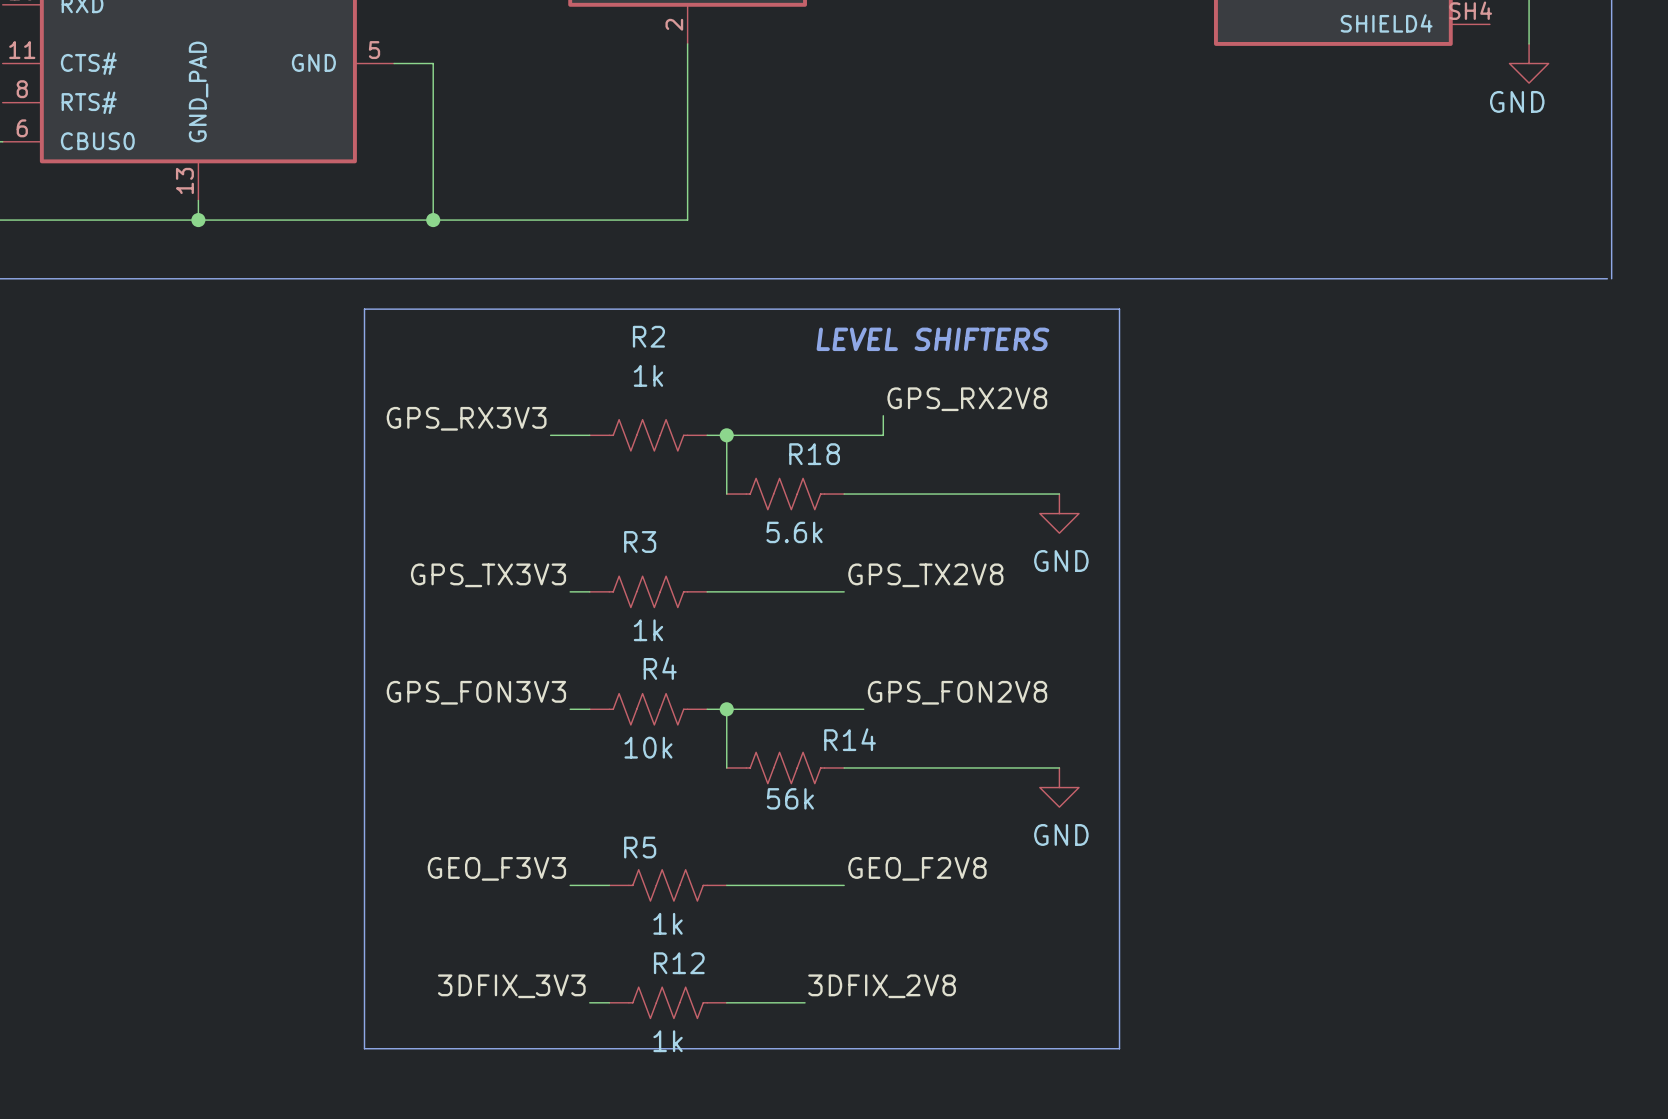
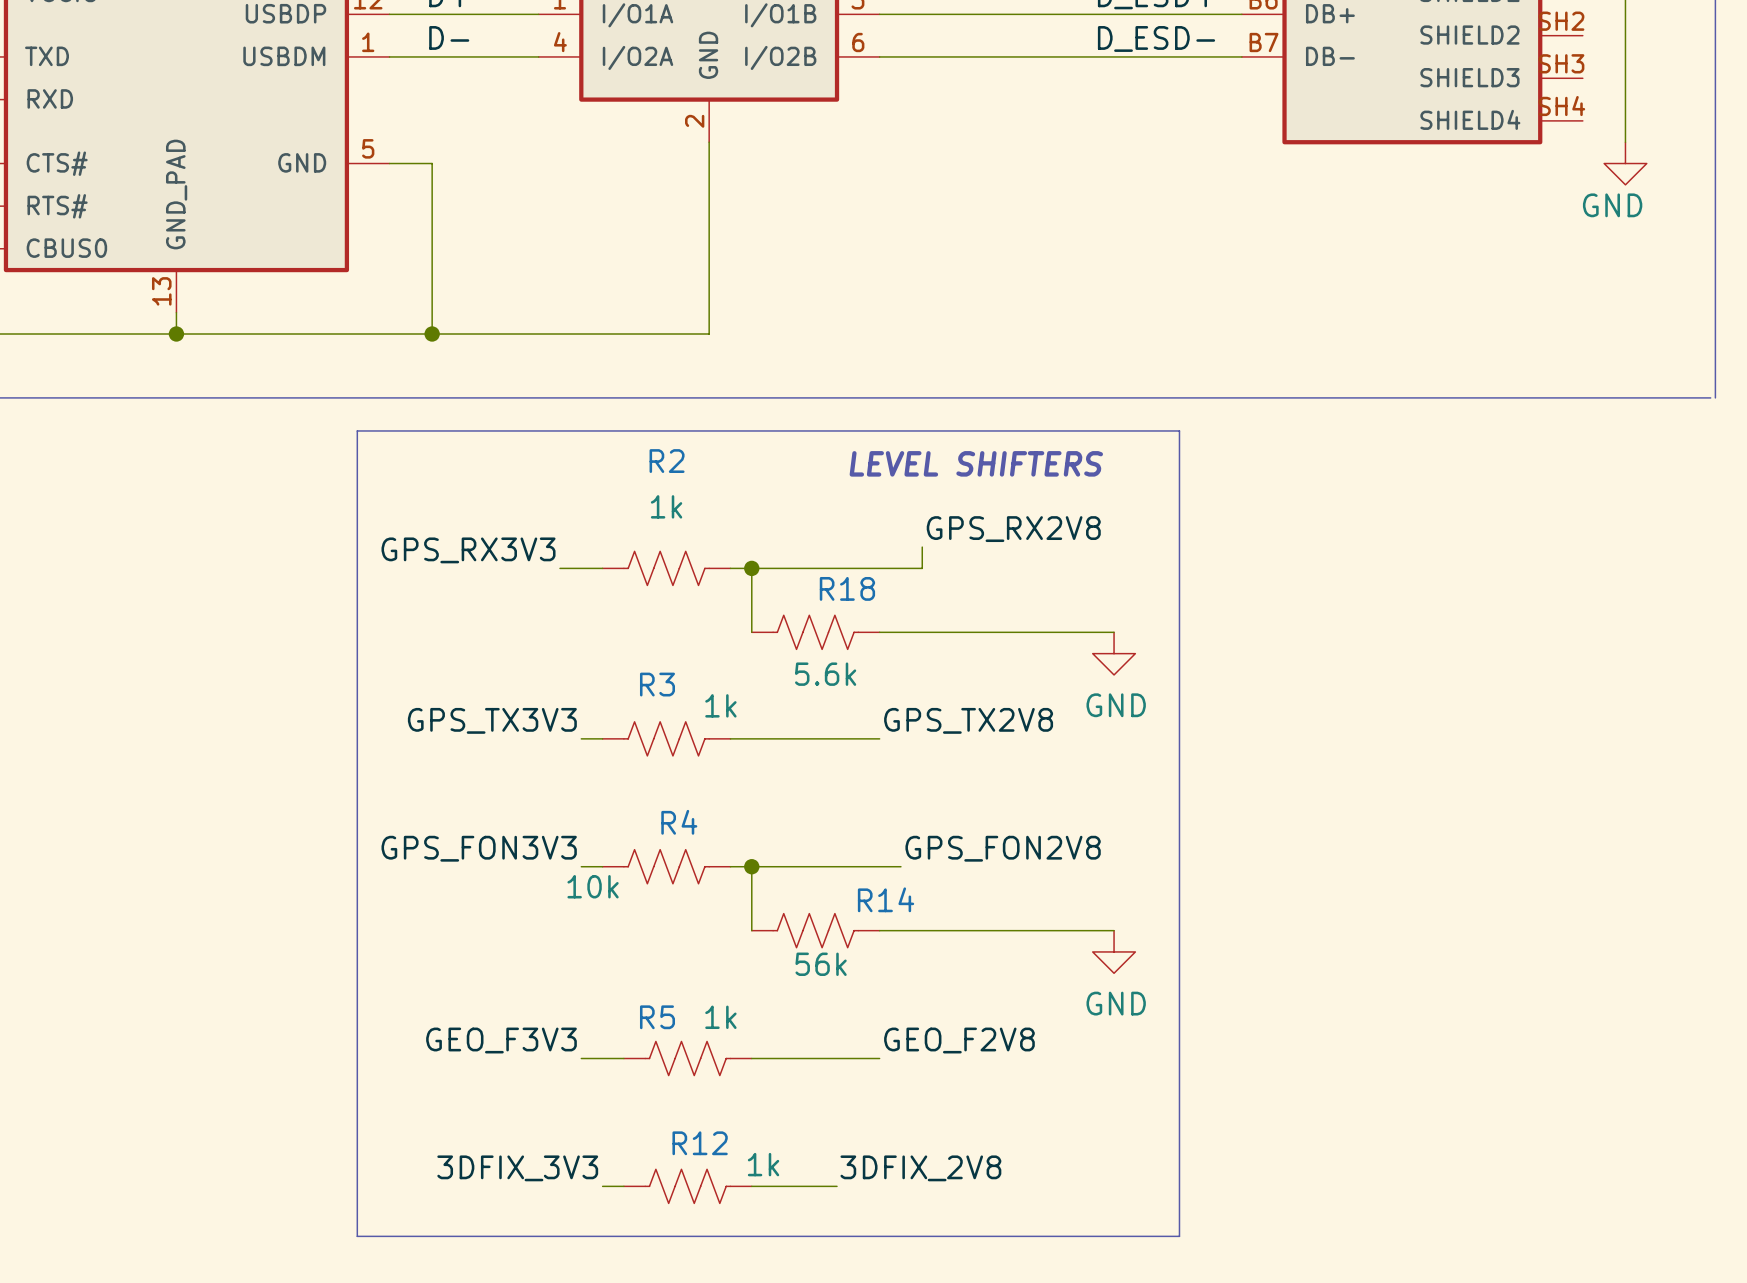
R2 value: 1k (648, 375) -> none
R2 text: none -> 1k (666, 506)
R3 text: none -> 1k (720, 705)
R3 value: 1k (648, 630) -> none
R4 text: none -> 10k (593, 886)
R4 value: 10k (648, 747) -> none
R5 text: none -> 1k (720, 1017)
R5 value: 1k (668, 923) -> none
R12 text: none -> 1k (763, 1164)
R12 value: 1k (668, 1041) -> none

